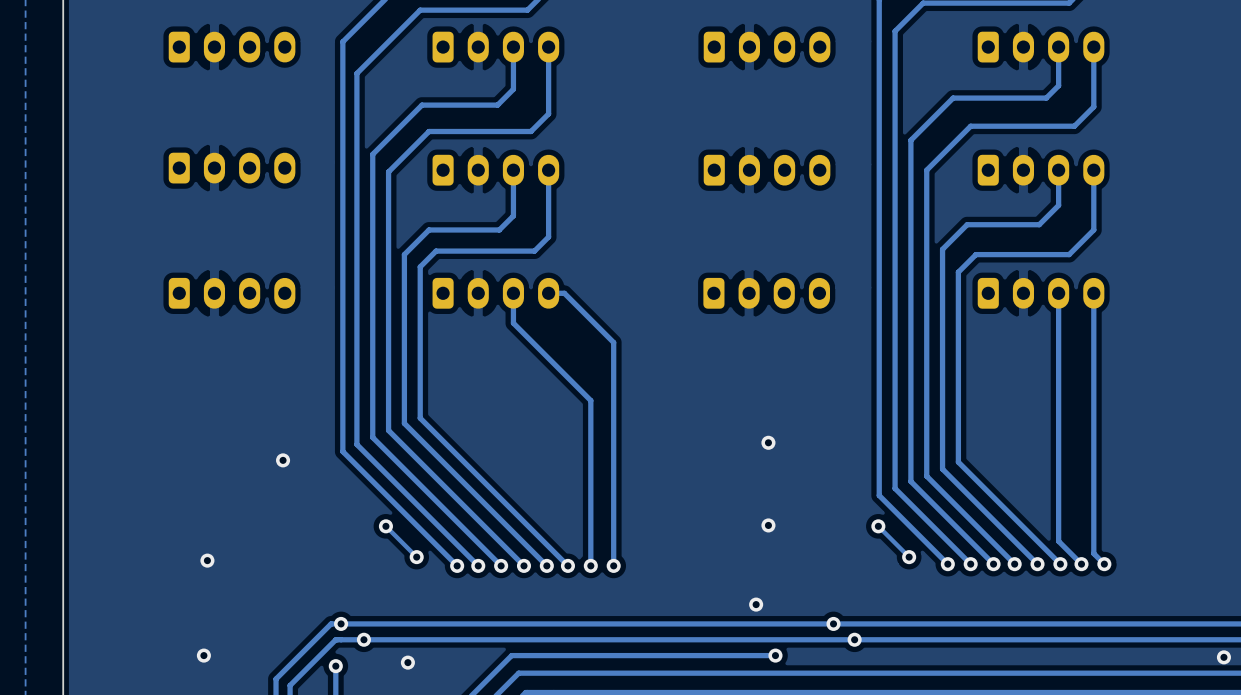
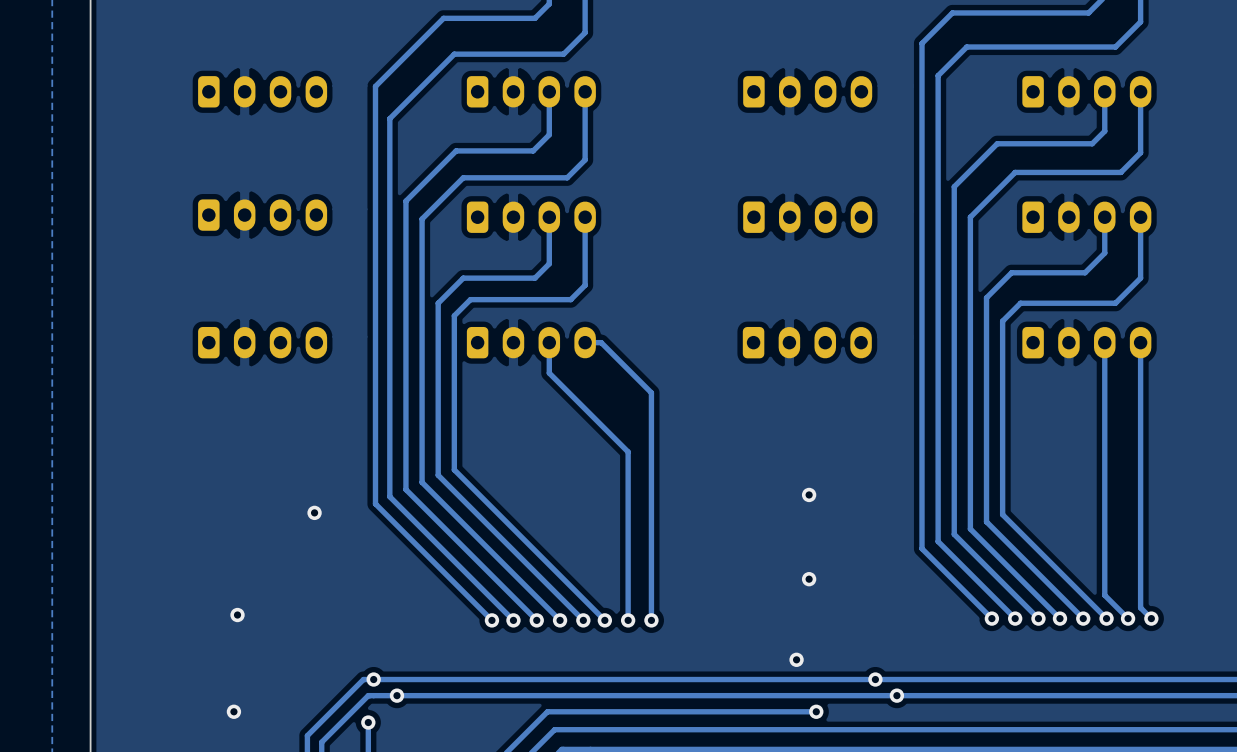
track: (385, 526) (416, 557) -> none
via: (385, 526) -> none
track: (878, 526) (909, 557) -> none
via: (878, 526) -> none
via: (416, 557) -> none
via: (909, 557) -> none
via: (407, 662) -> none

